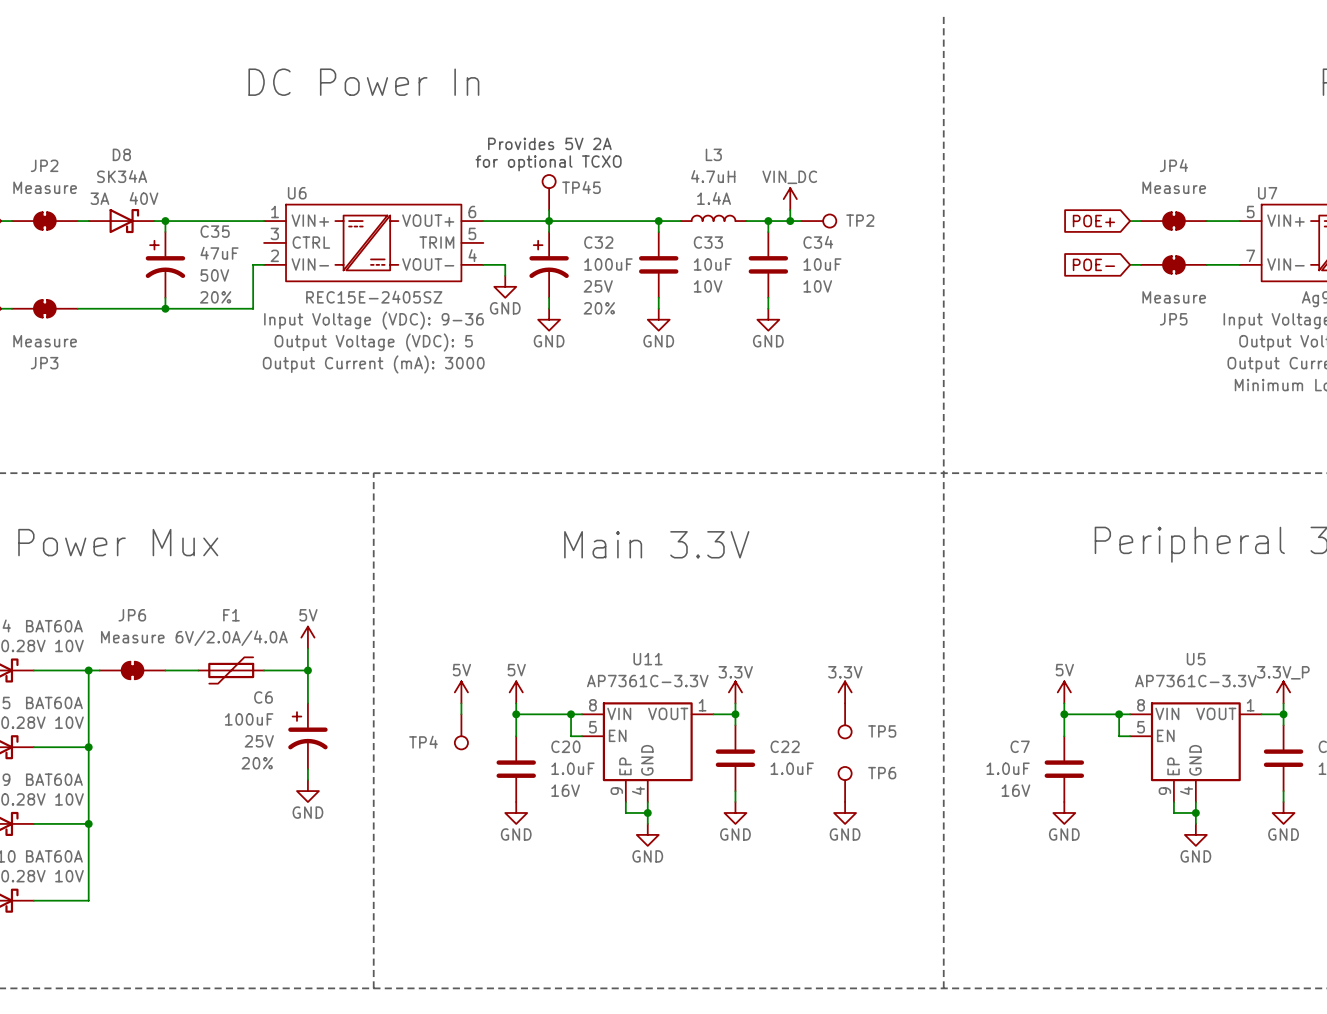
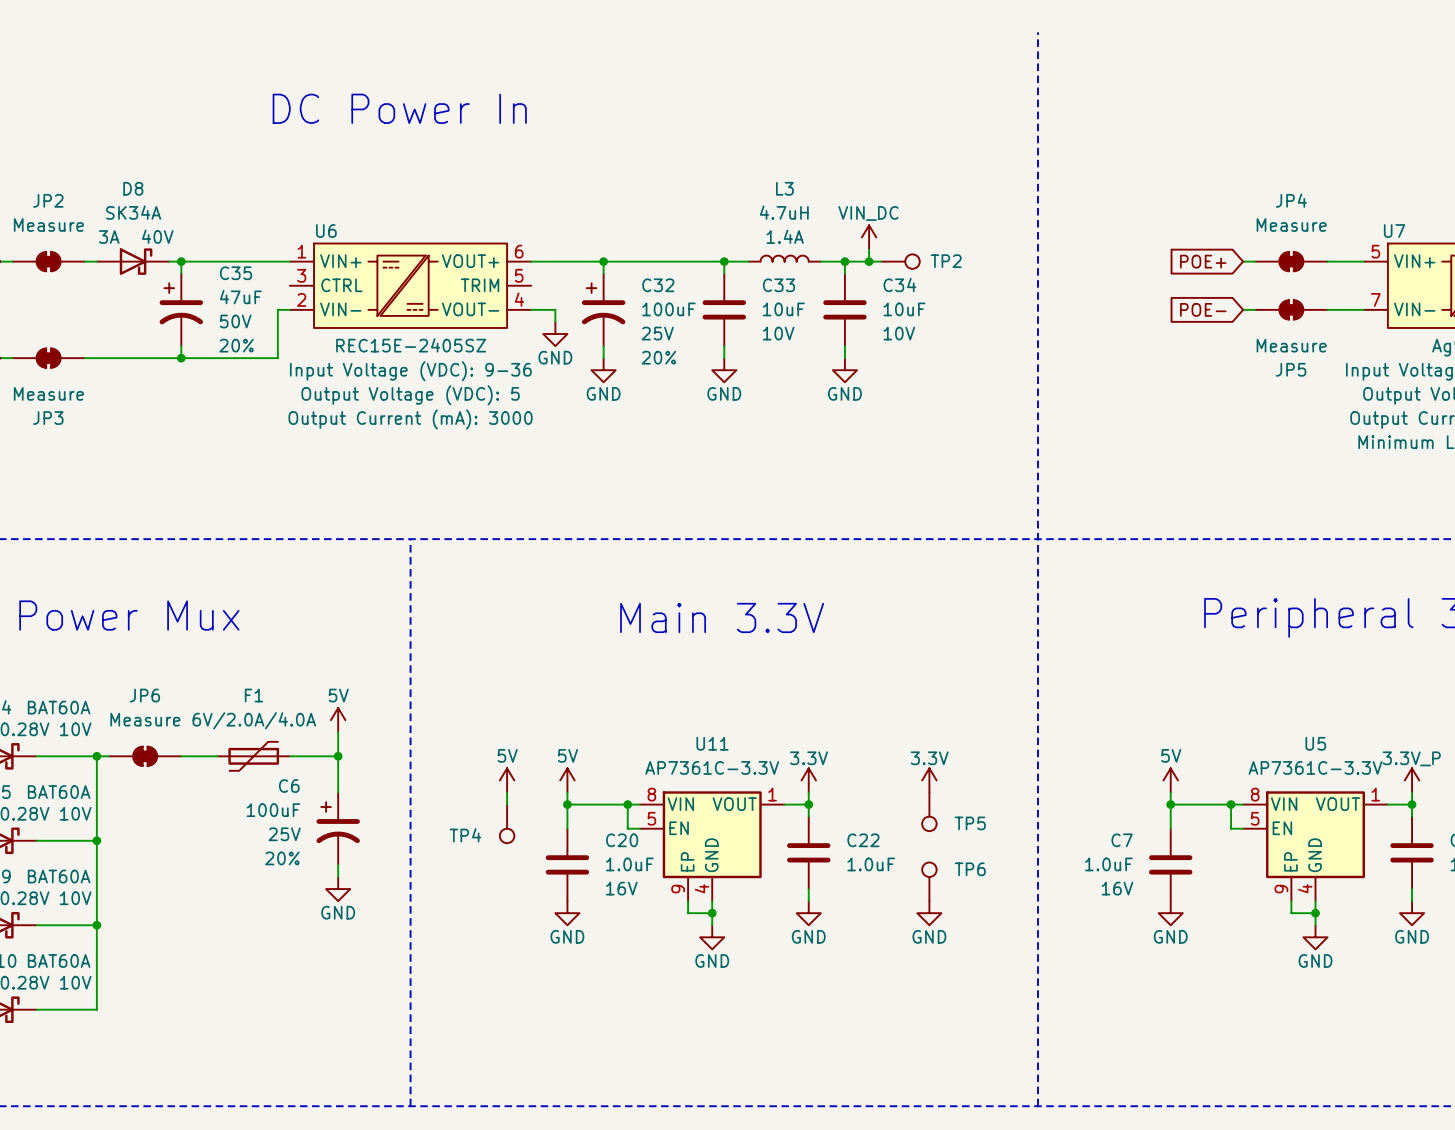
text: Provides 5V 2A (549, 143) -> none
text: for optional TCXO (548, 163) -> none
TP45: (549, 192) -> none
wire: (549, 210) (549, 221) -> none

